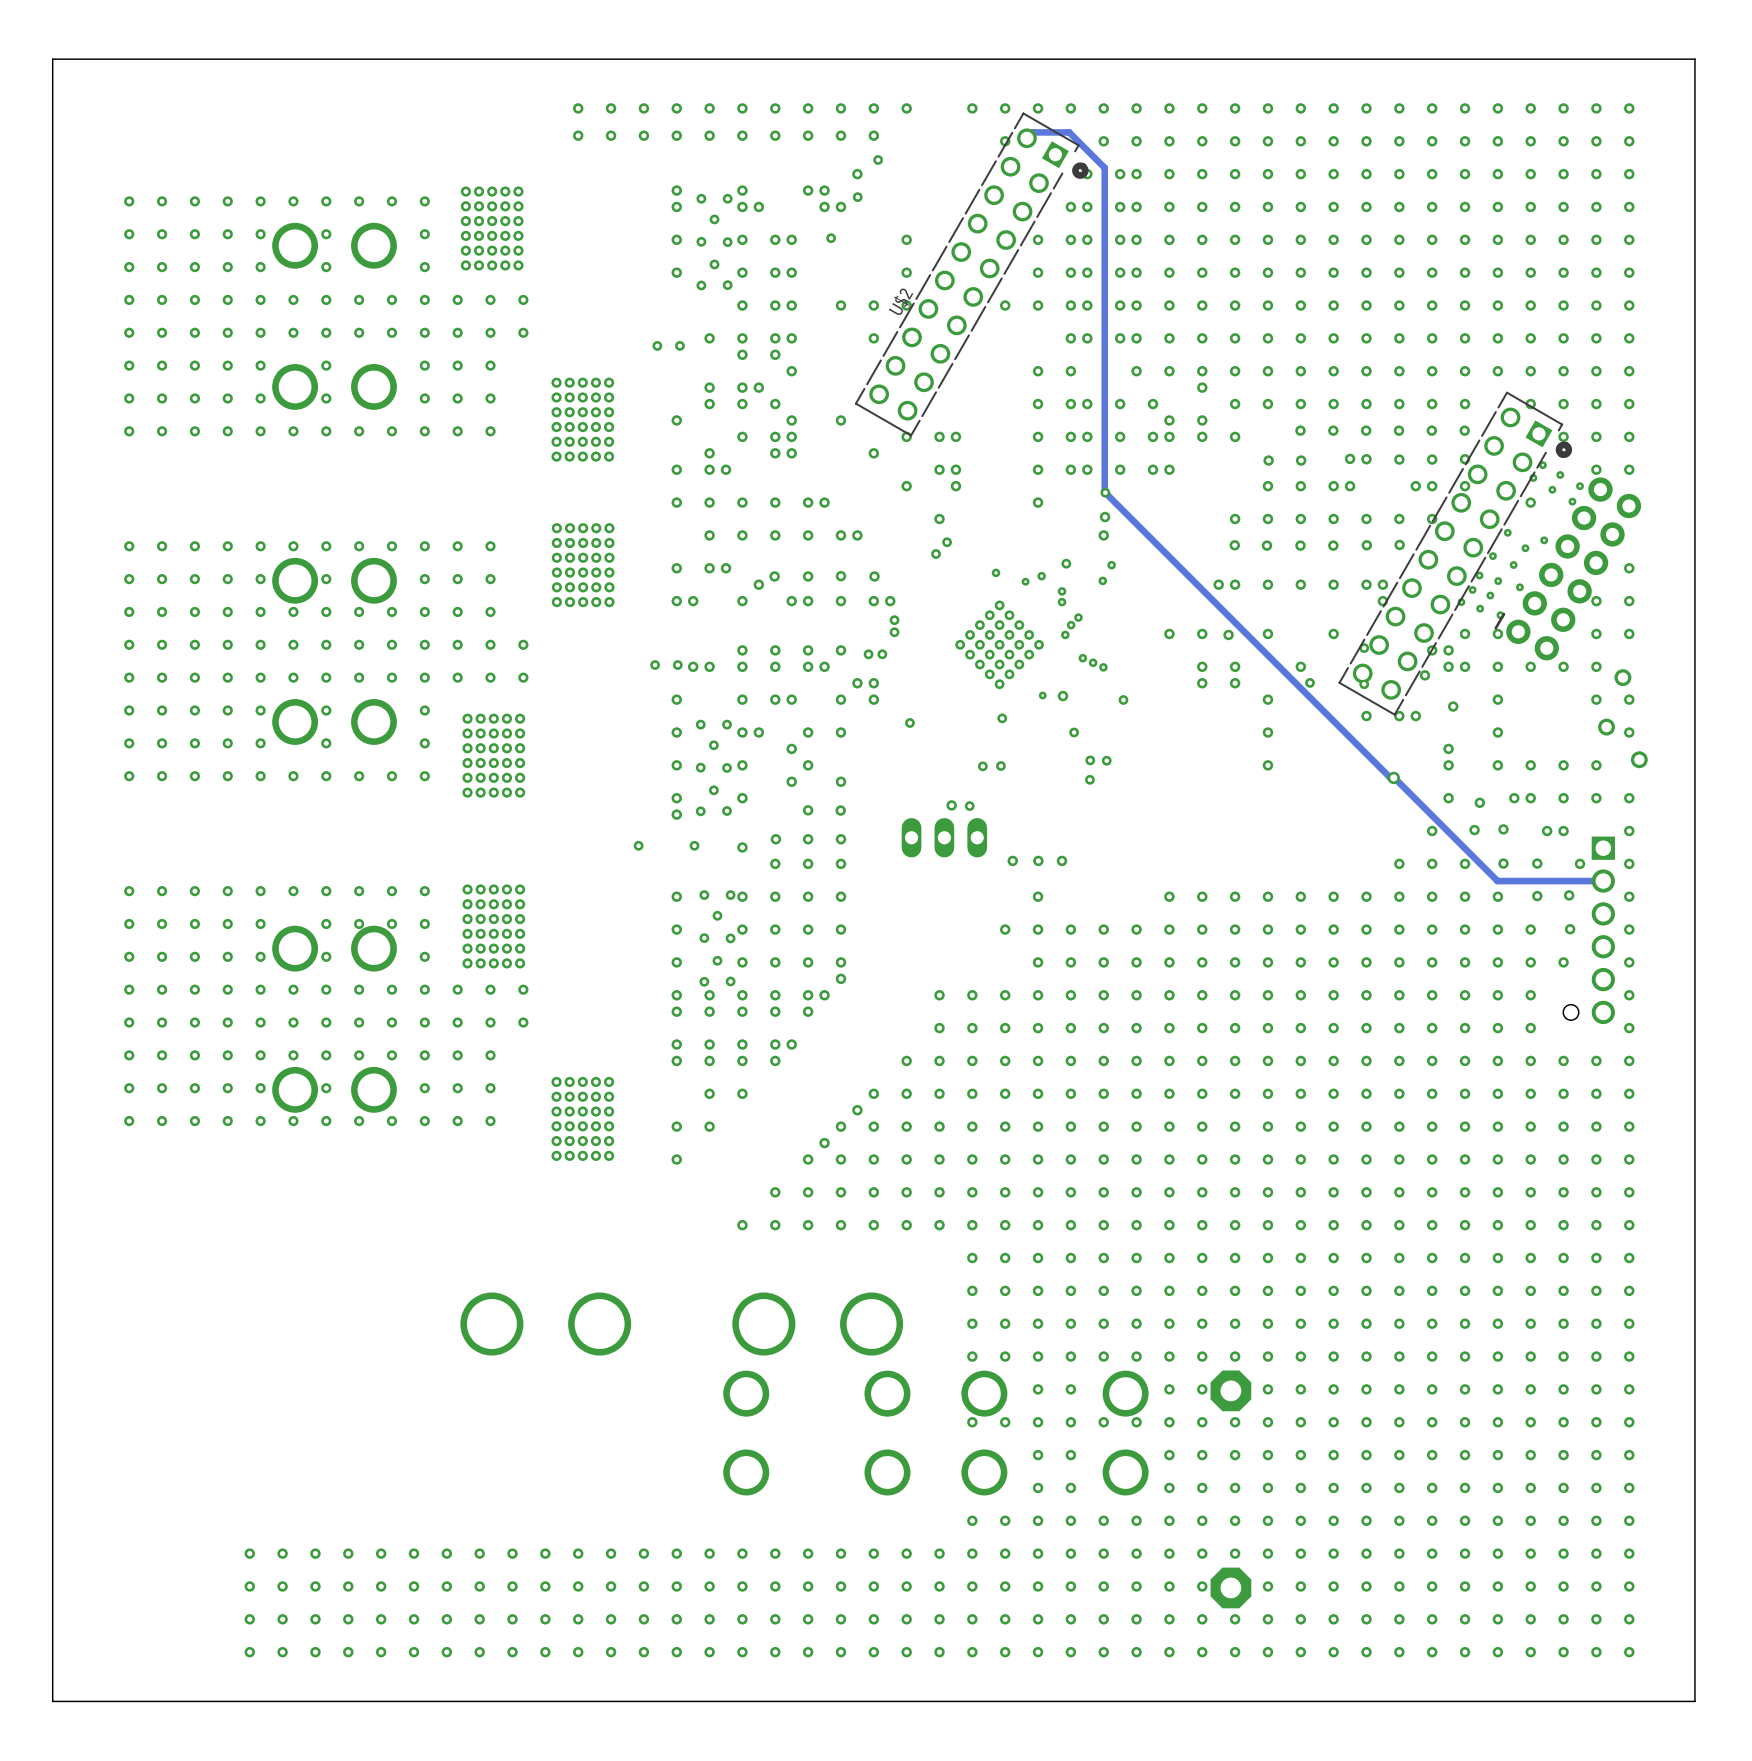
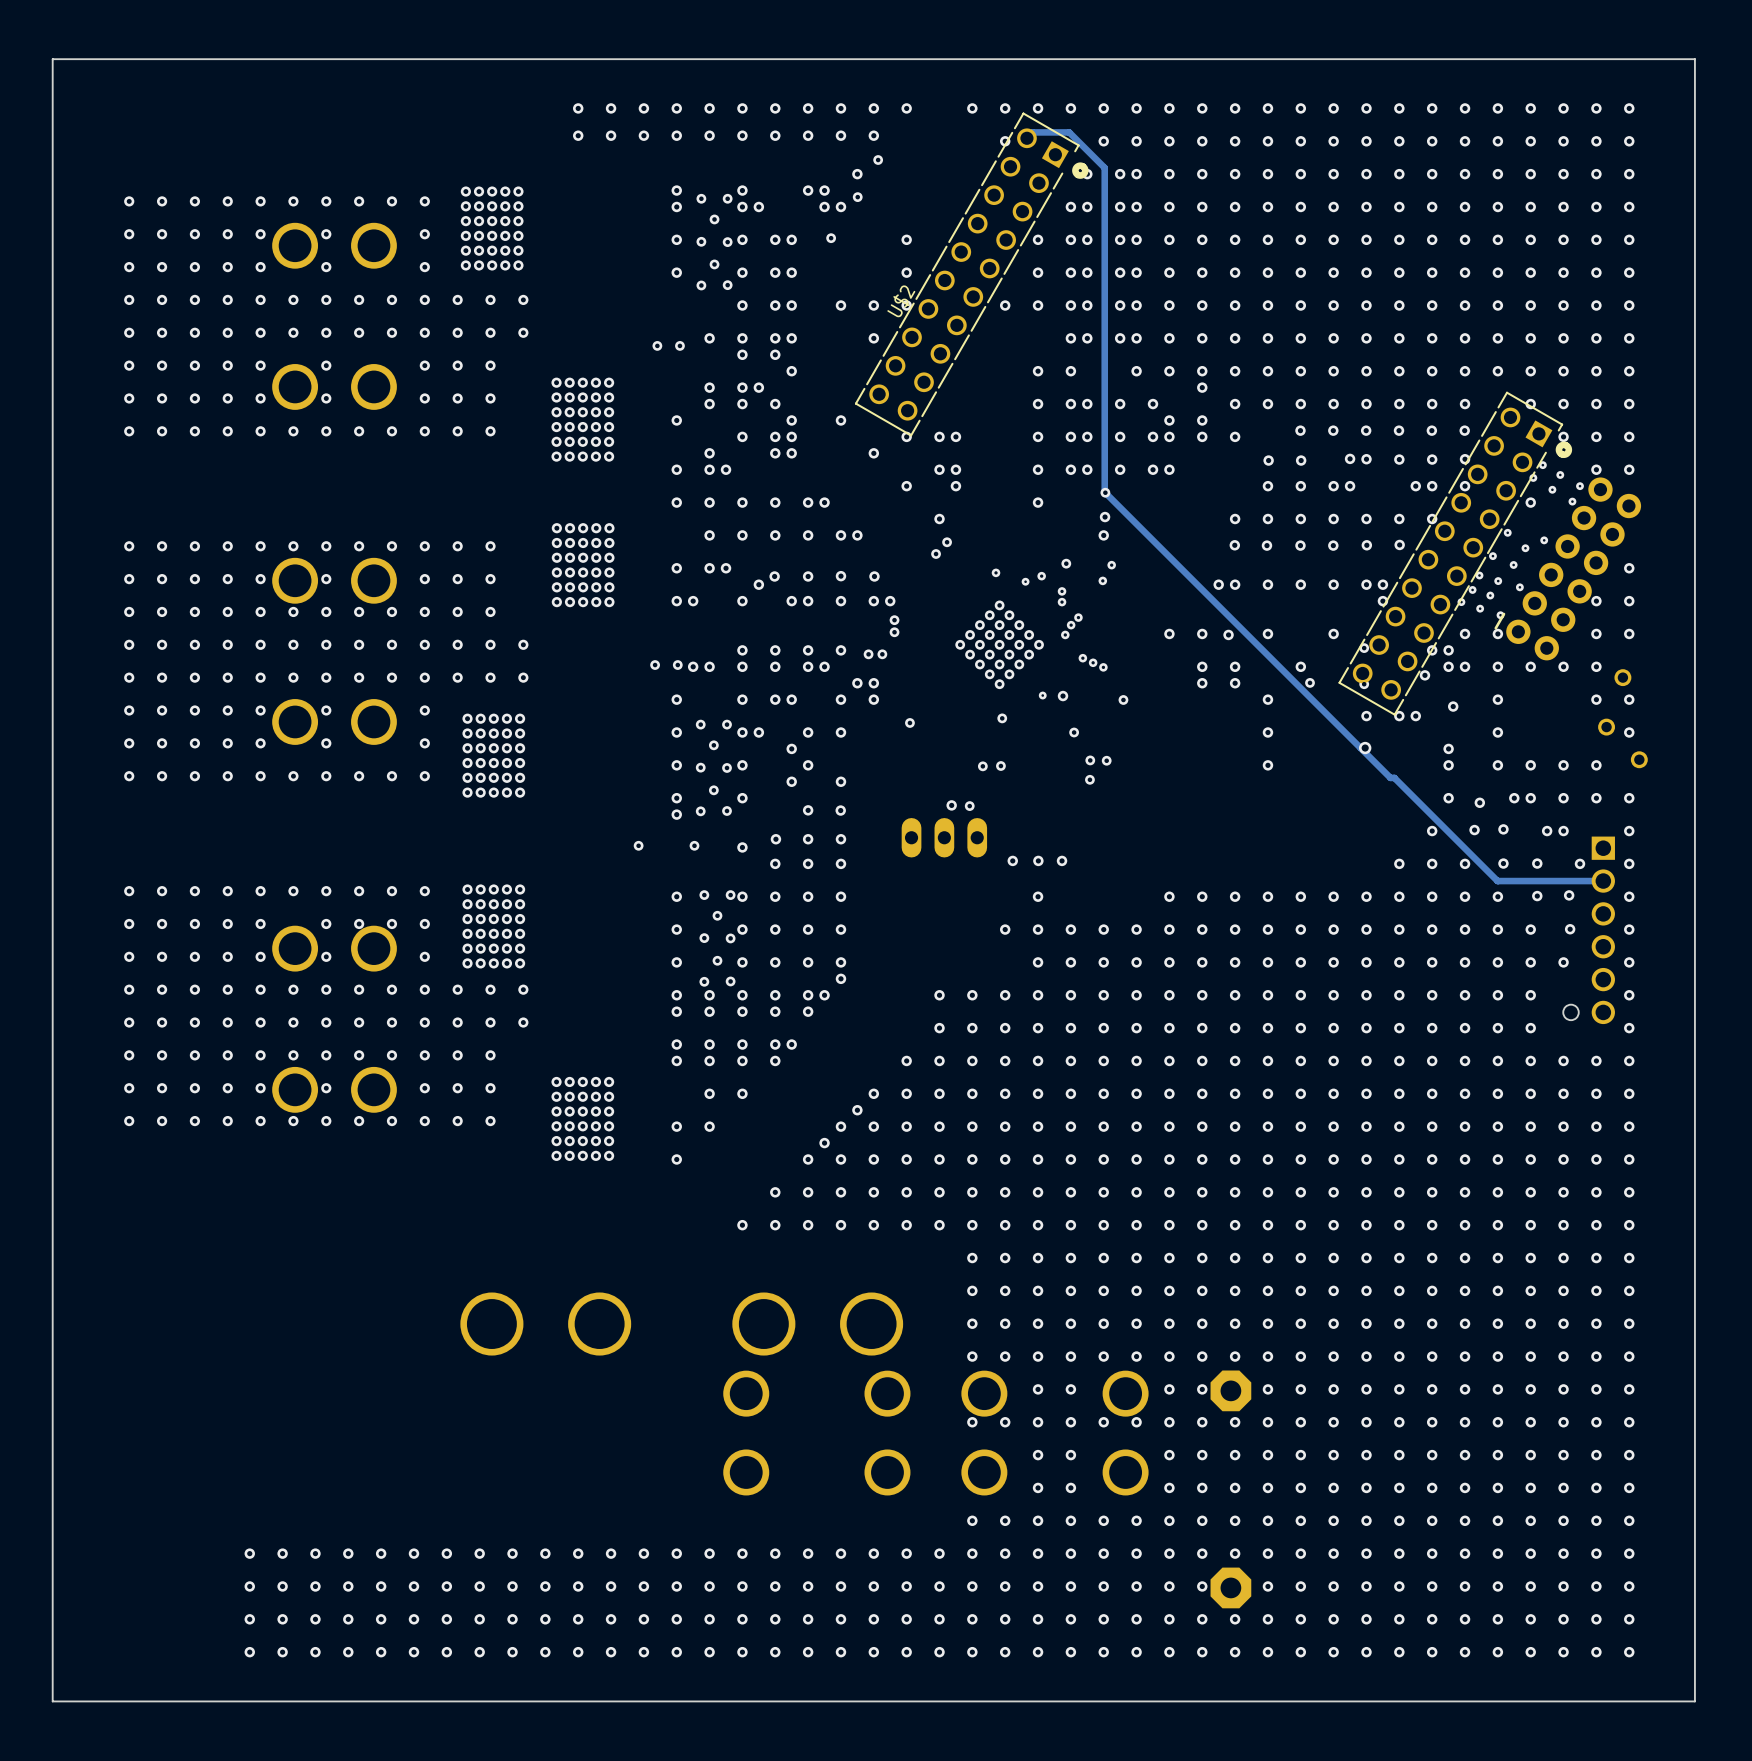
via position: (1393, 777) -> (1365, 748)

